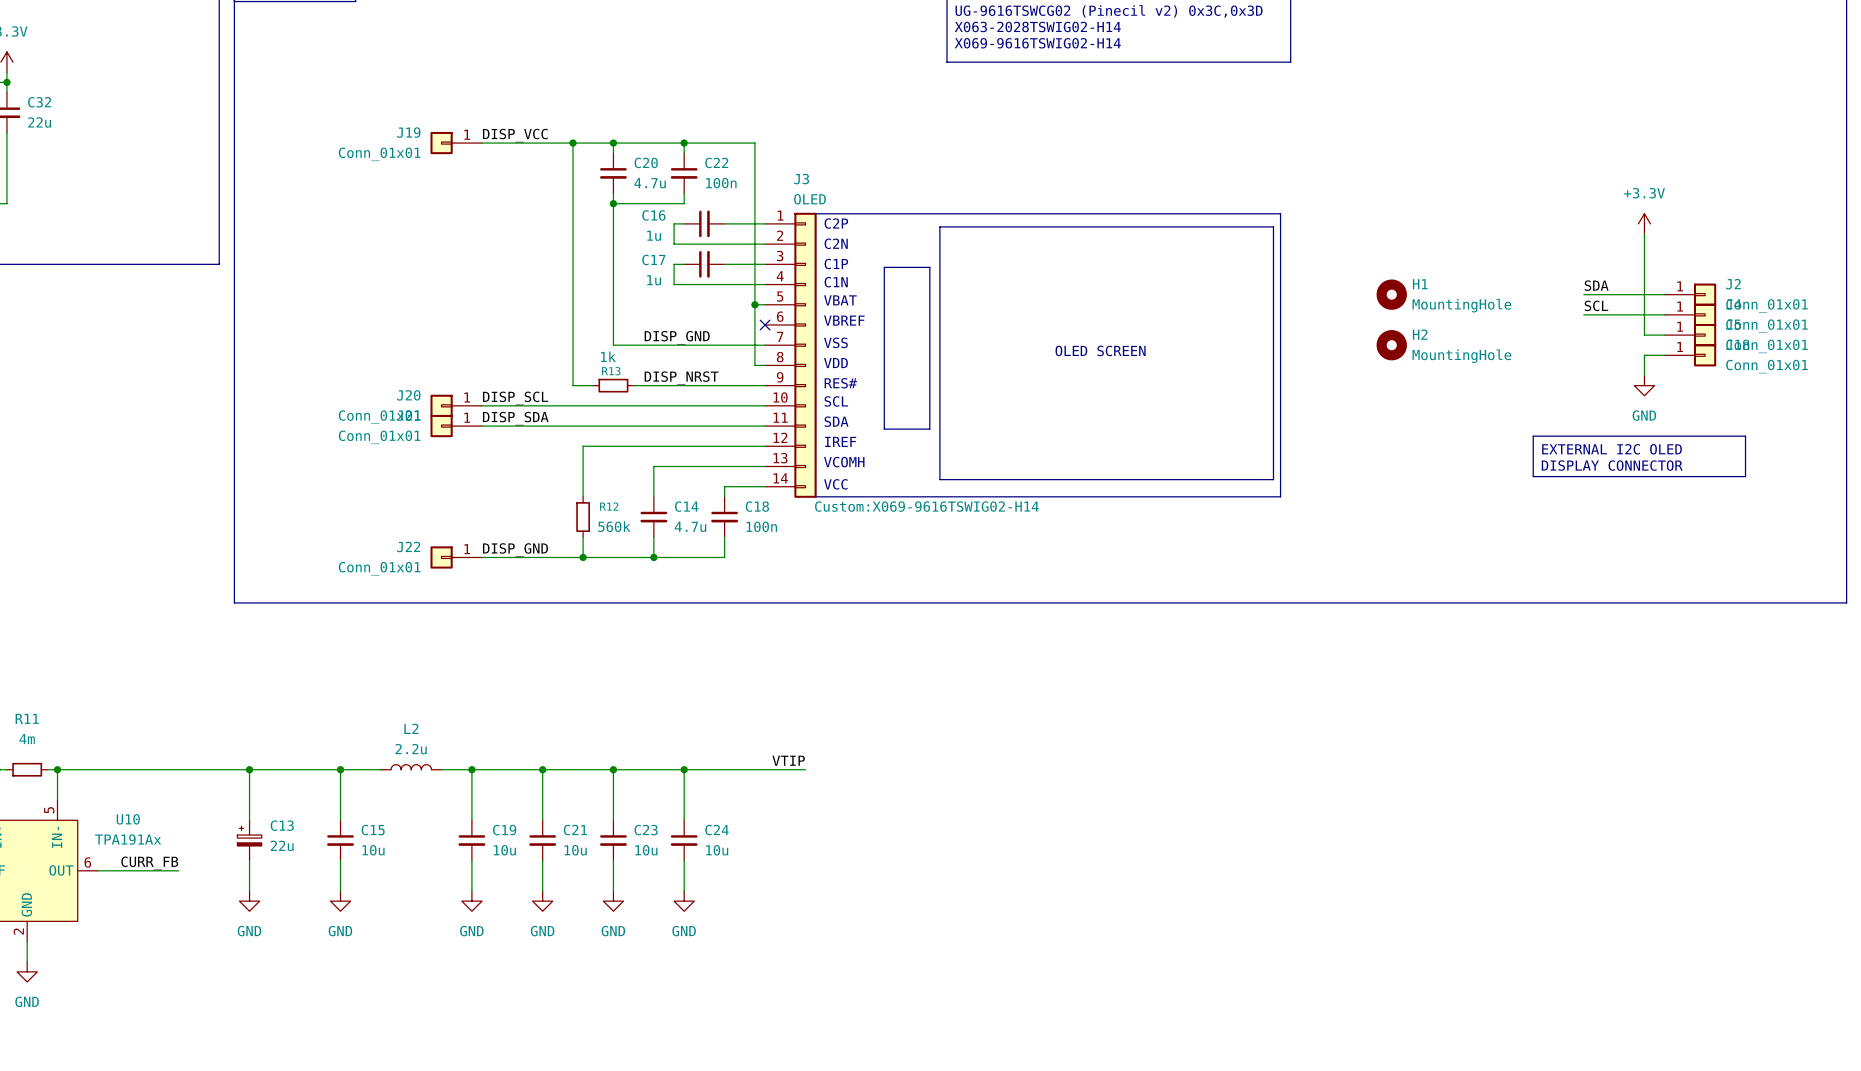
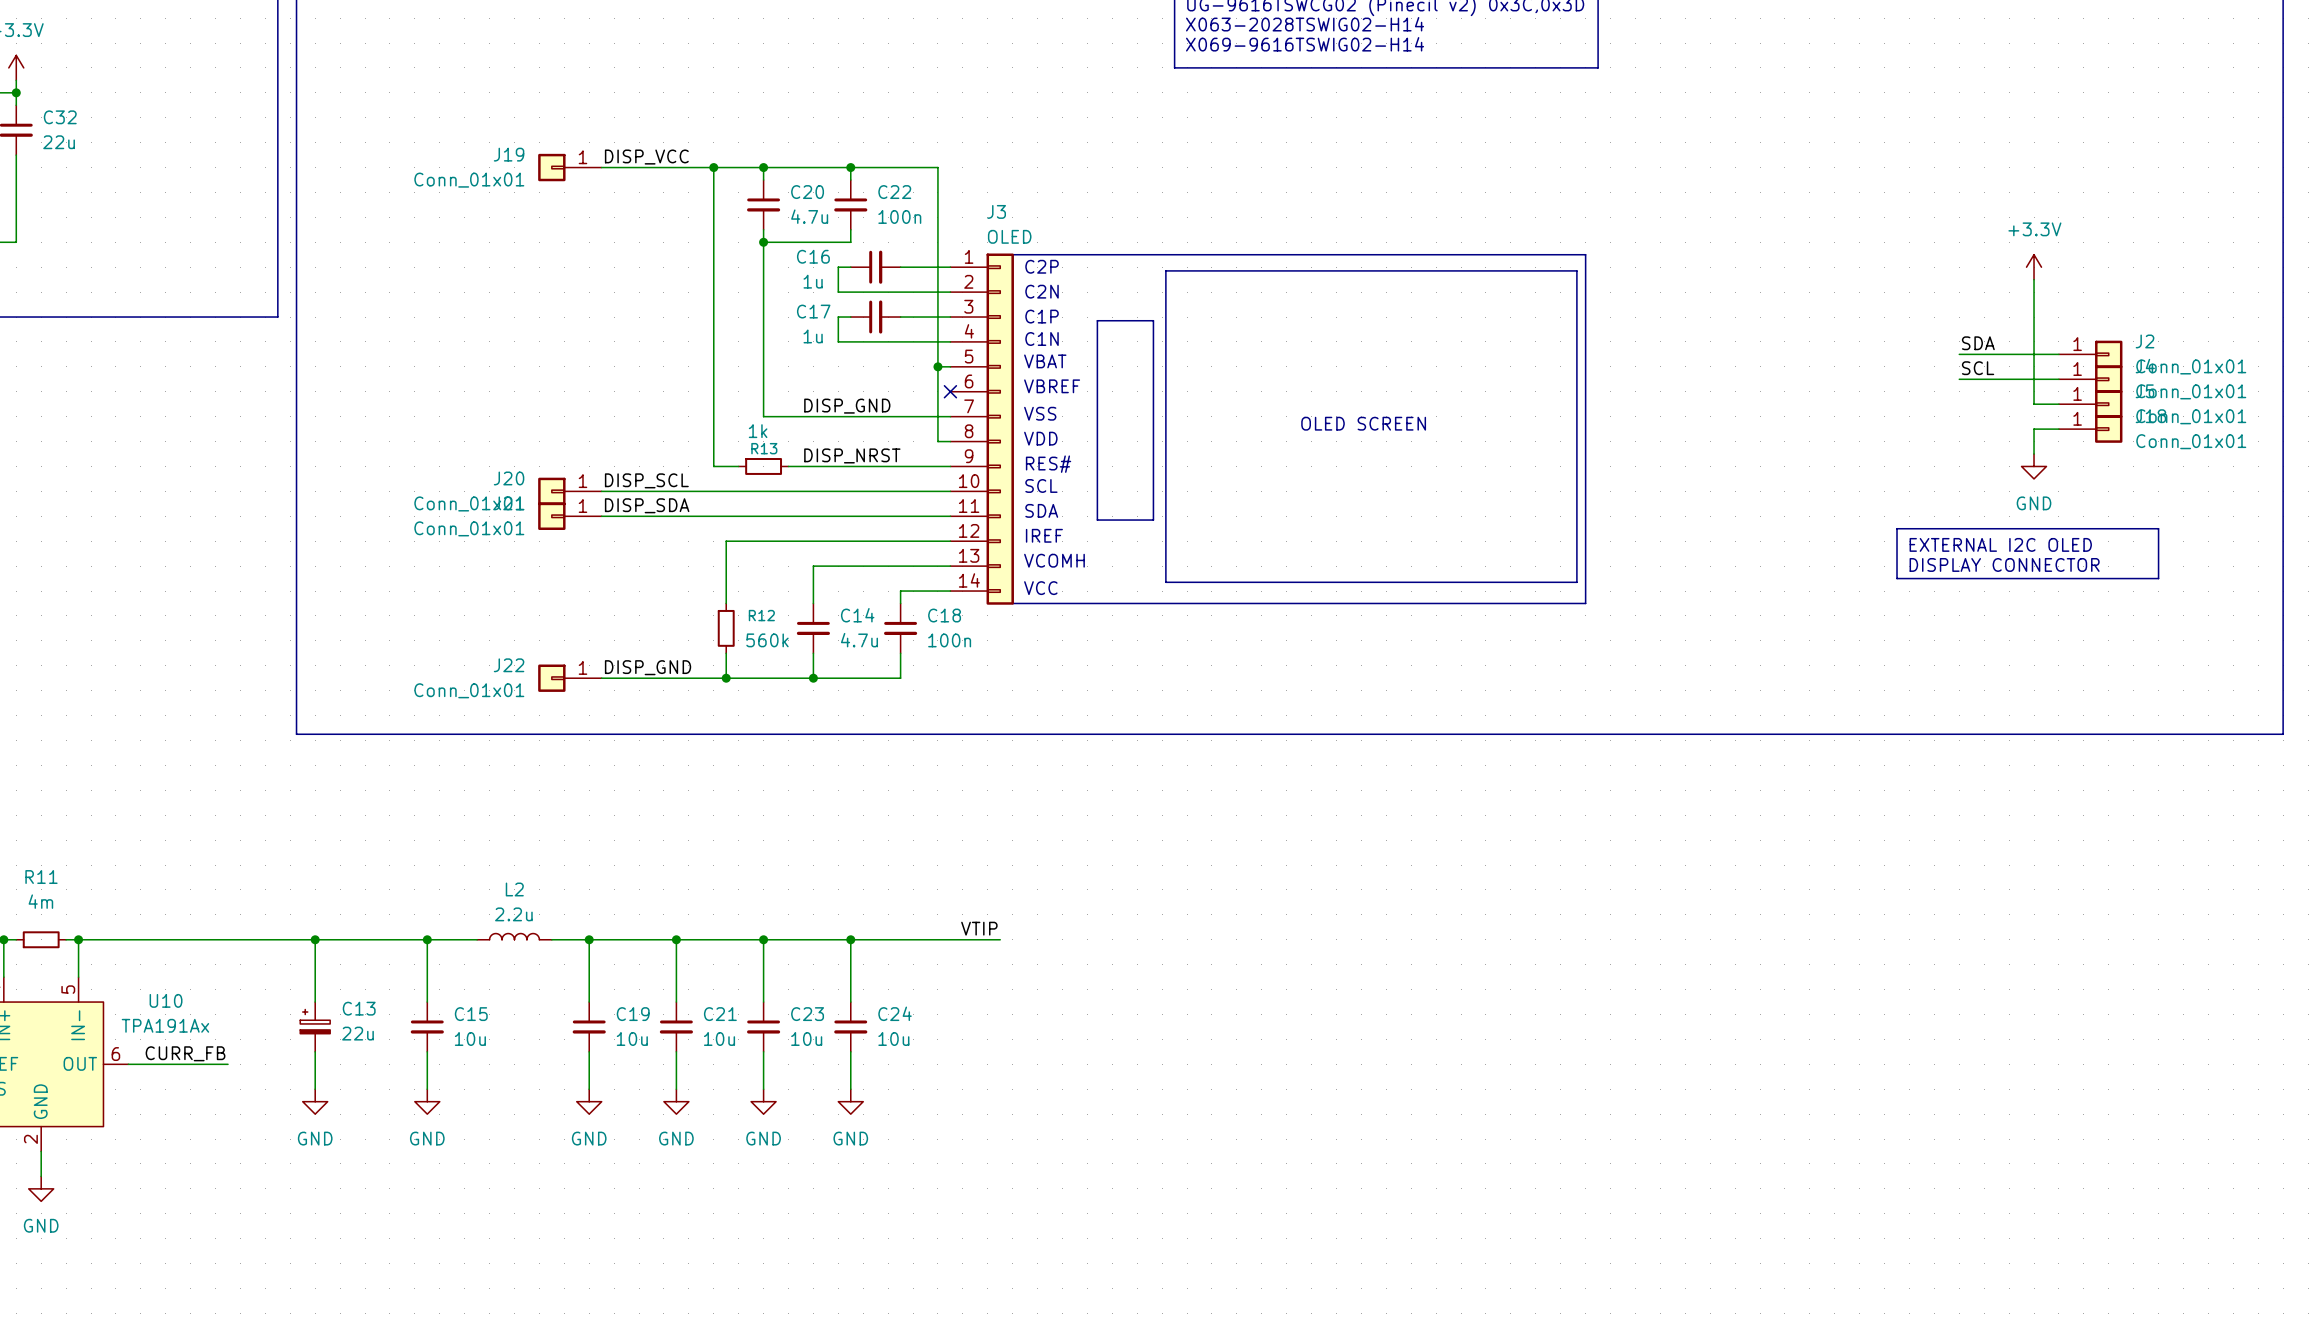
H1: MountingHole (1391, 294) -> none
H2: MountingHole (1391, 345) -> none
J3 text: Custom:X069-9616TSWIG02-H14 (926, 506) -> none

